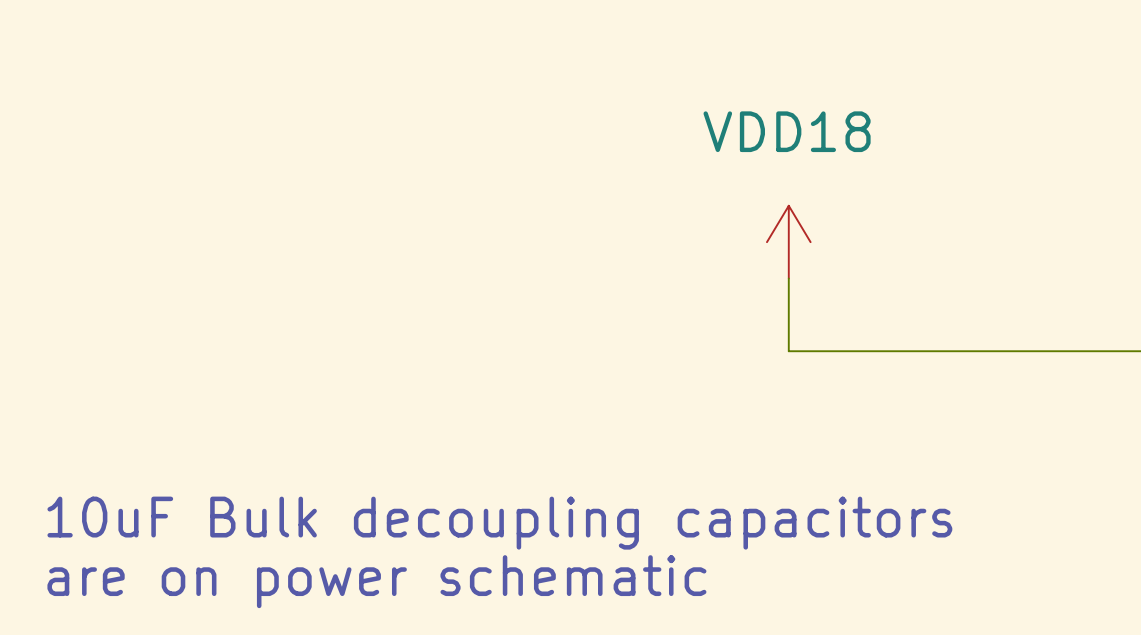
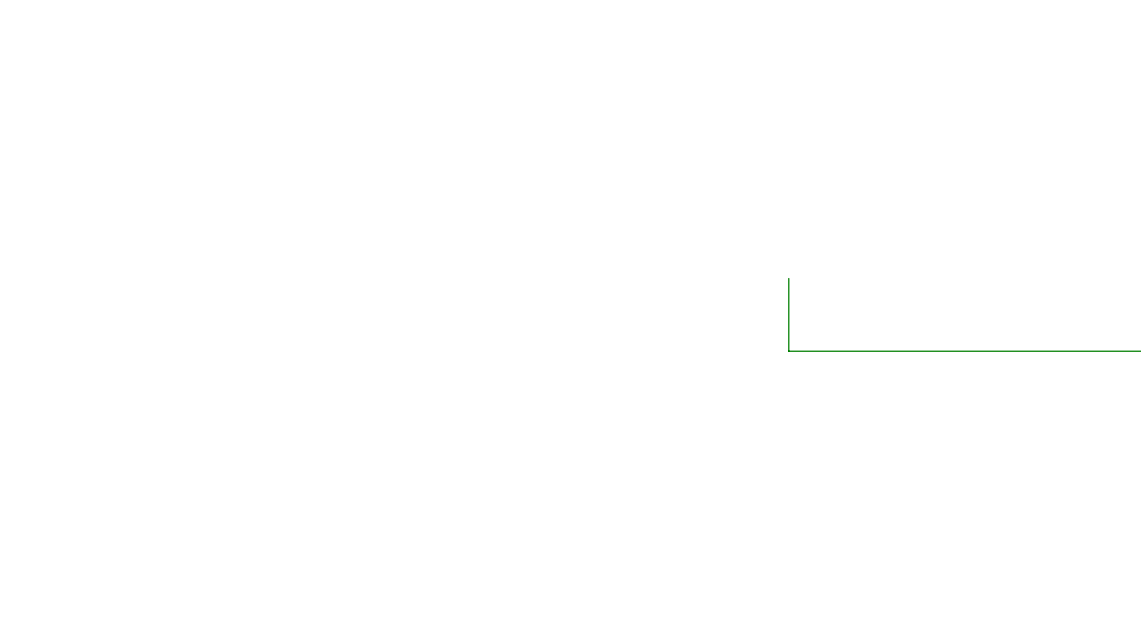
power symbol: VDD18 (788, 242) -> none
text: 10uF Bulk decoupling capacitors (499, 523) -> none
text: are on power schematic (376, 581) -> none

